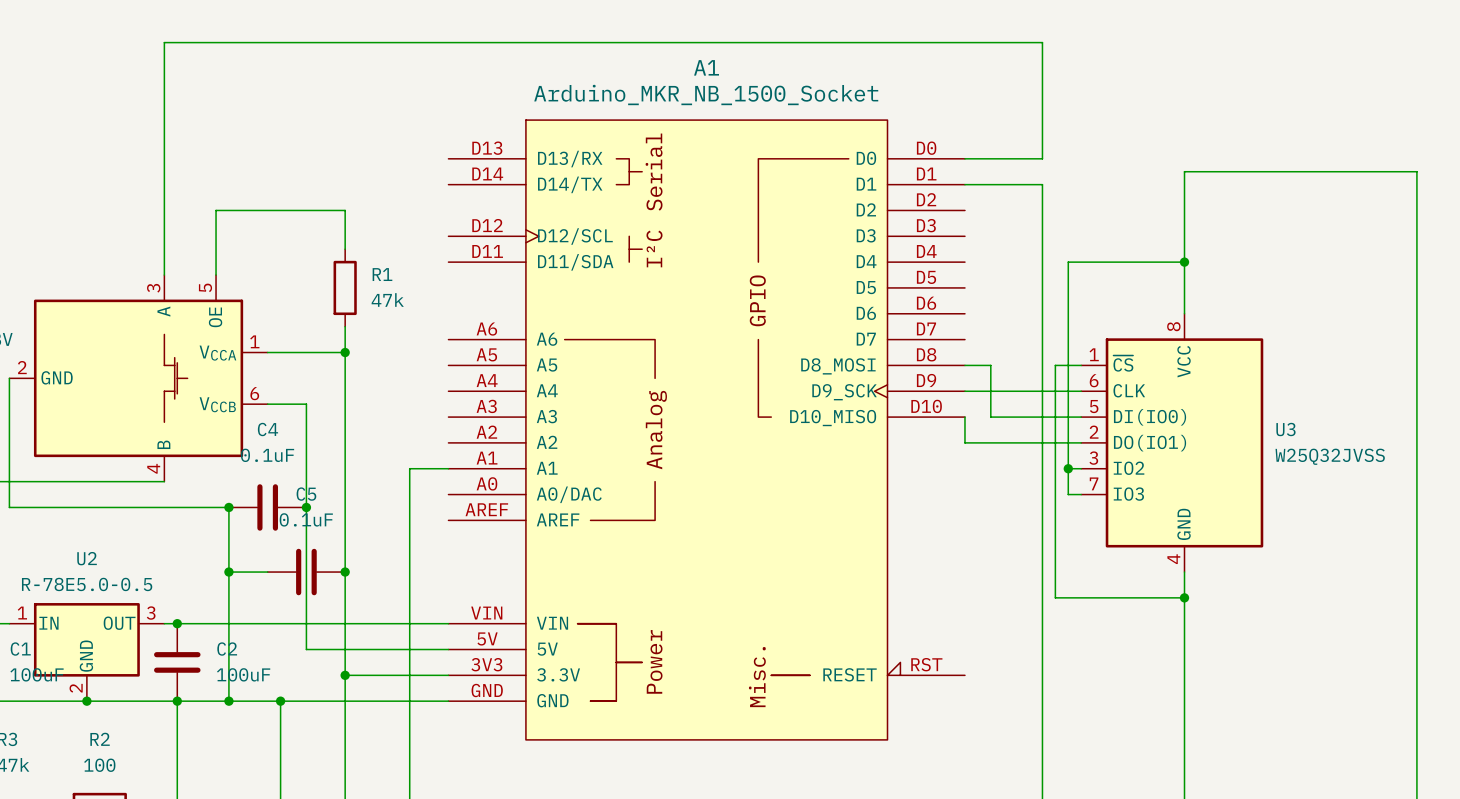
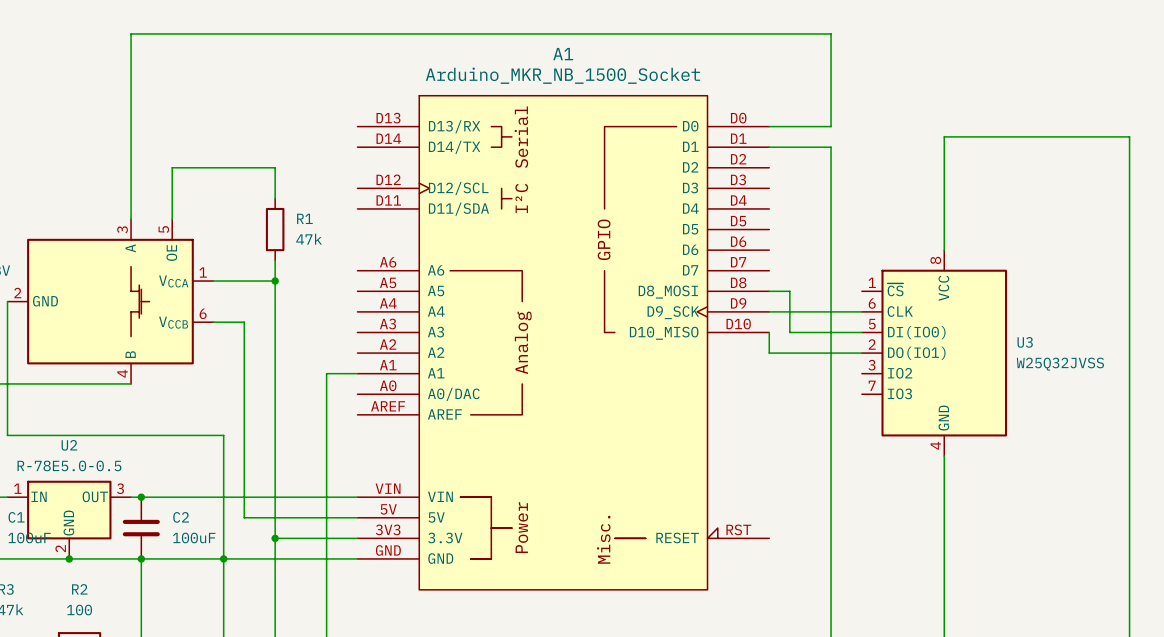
wire: (1184, 262) (1068, 262) (1068, 494) (1081, 494) -> none
junction: (1184, 262) -> none
wire: (1081, 365) (1055, 365) (1055, 597) (1184, 597) -> none
wire: (1068, 468) (1081, 468) -> none
junction: (1068, 468) -> none
wire: (9, 507) (228, 507) (228, 701) -> (7, 404) (7, 435) (223, 435) (223, 558)
junction: (228, 507) -> none
C4: 0.1uF (267, 507) -> none
junction: (306, 507) -> none
wire: (228, 572) (267, 572) -> none
junction: (228, 572) -> none
C5: 0.1uF (306, 572) -> none
junction: (345, 572) -> none
junction: (1184, 597) -> none
junction: (228, 701) -> none

